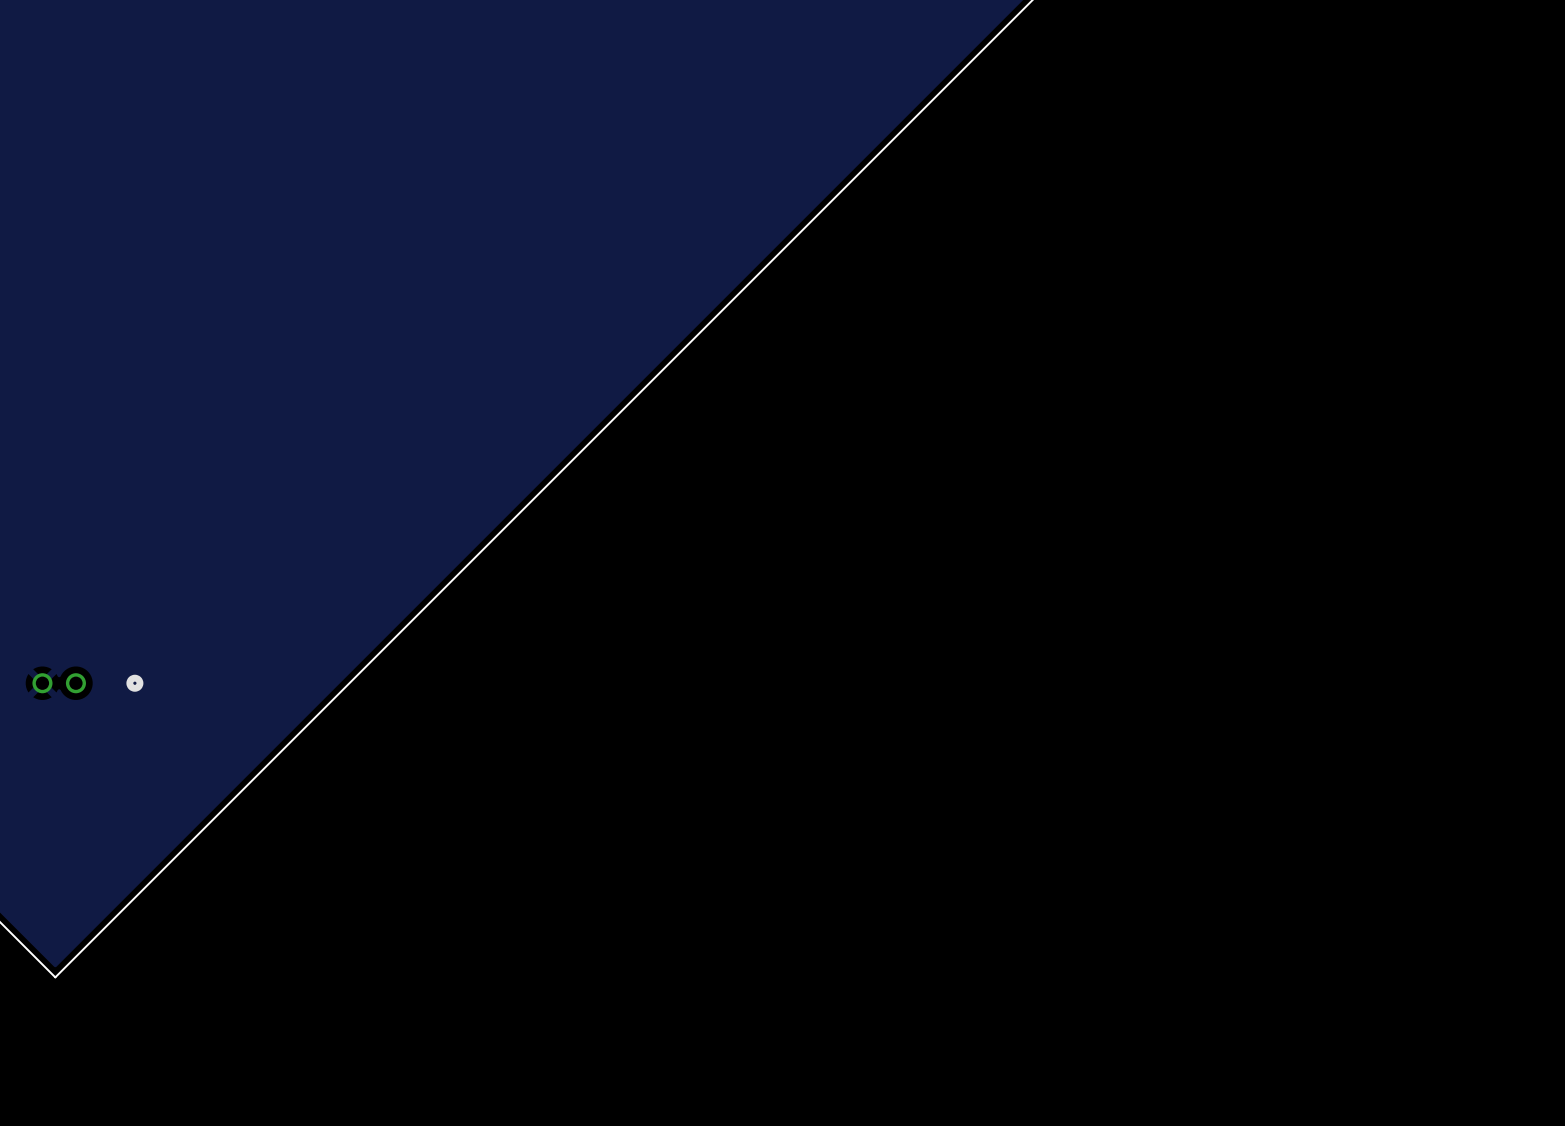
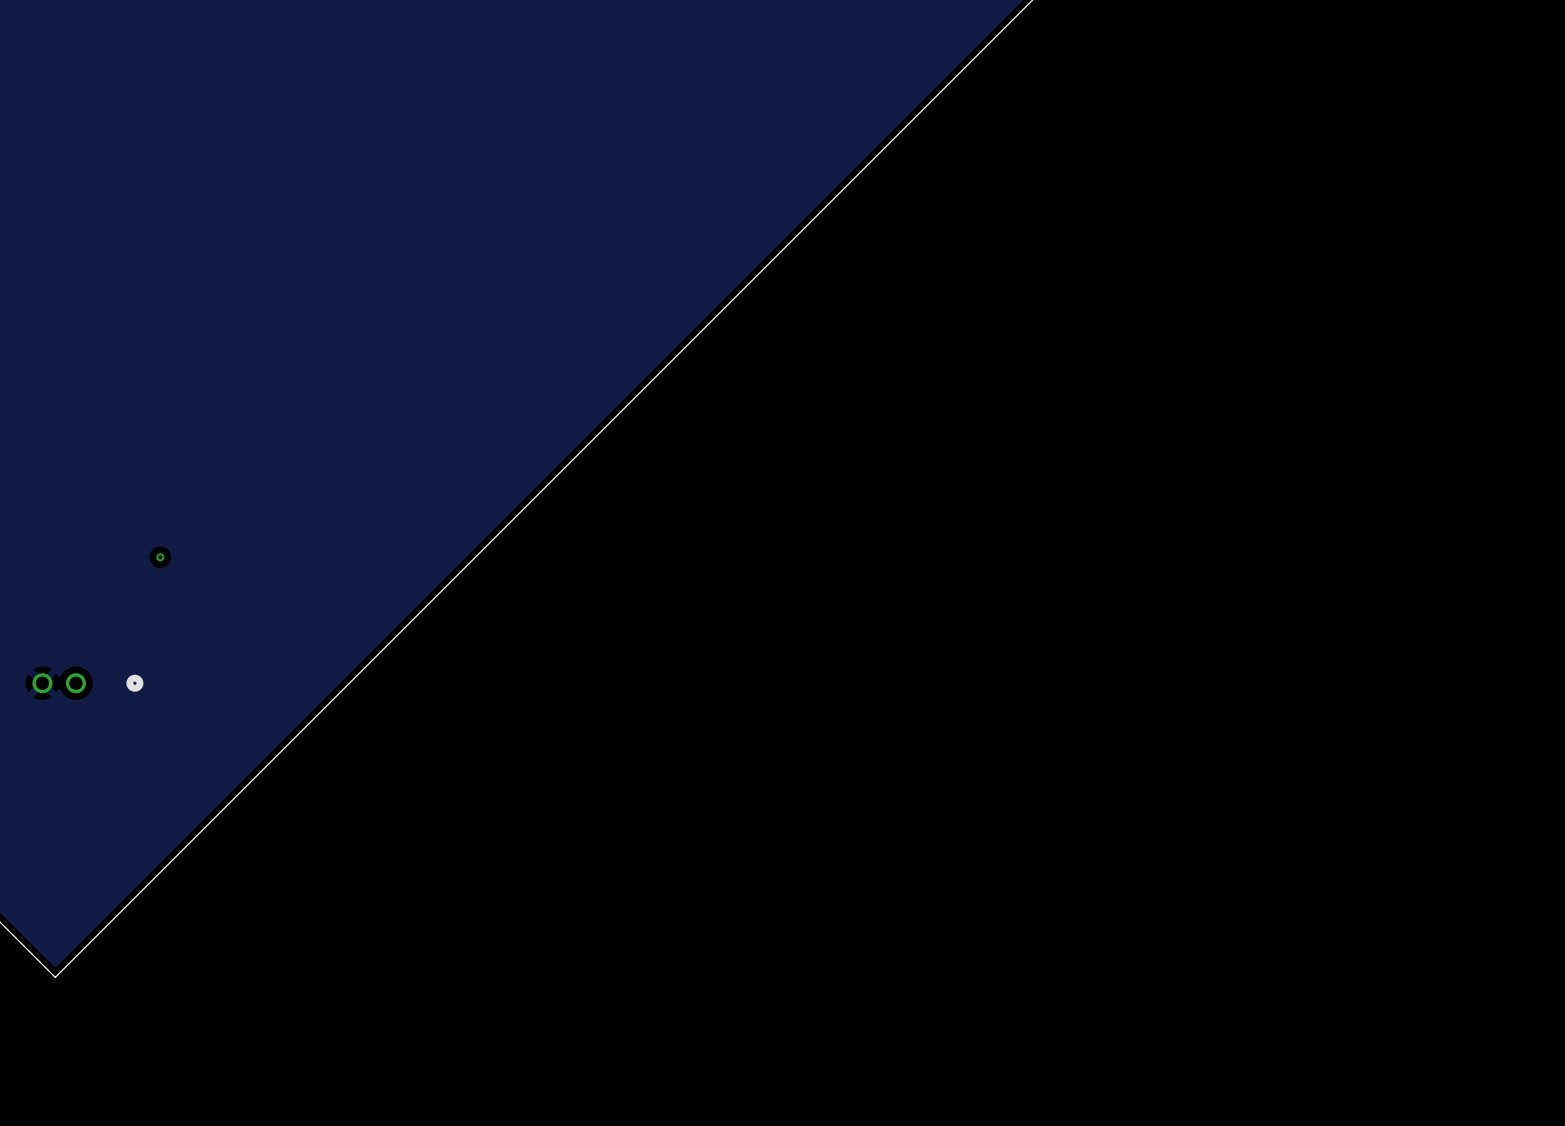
via: none -> (160, 557)

